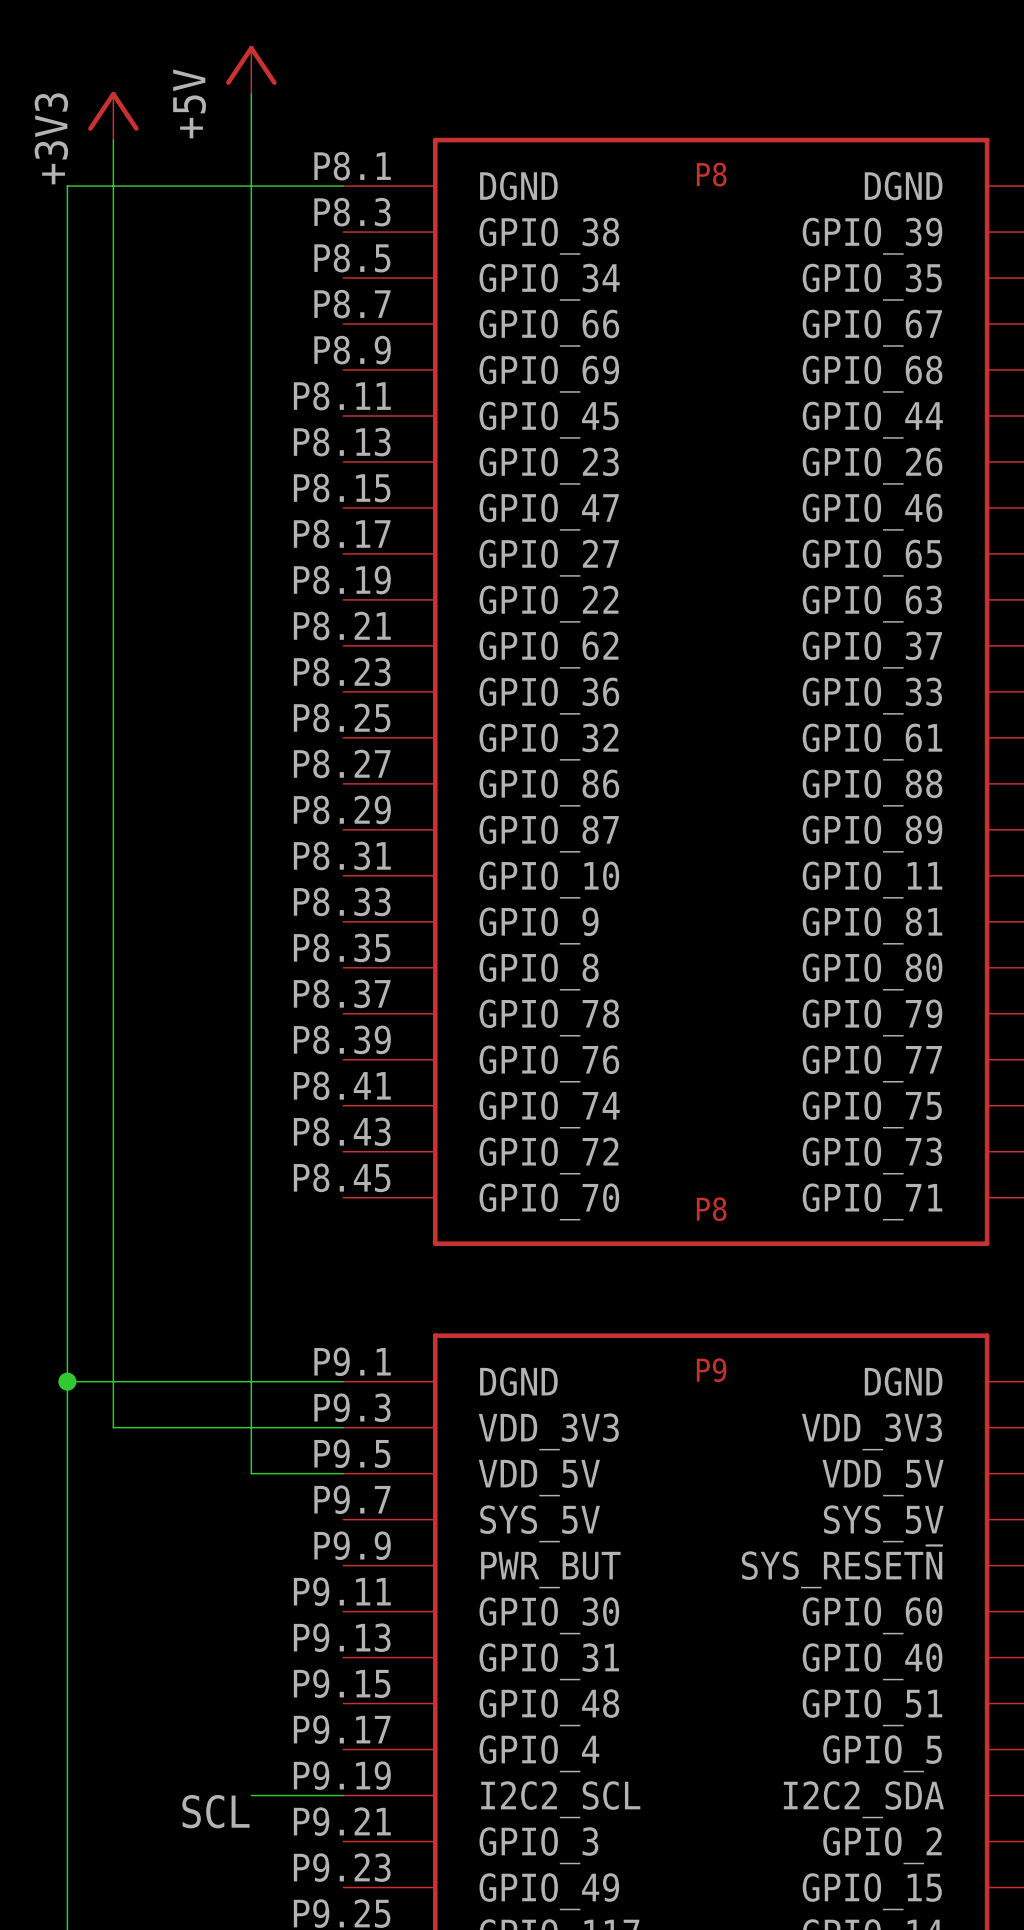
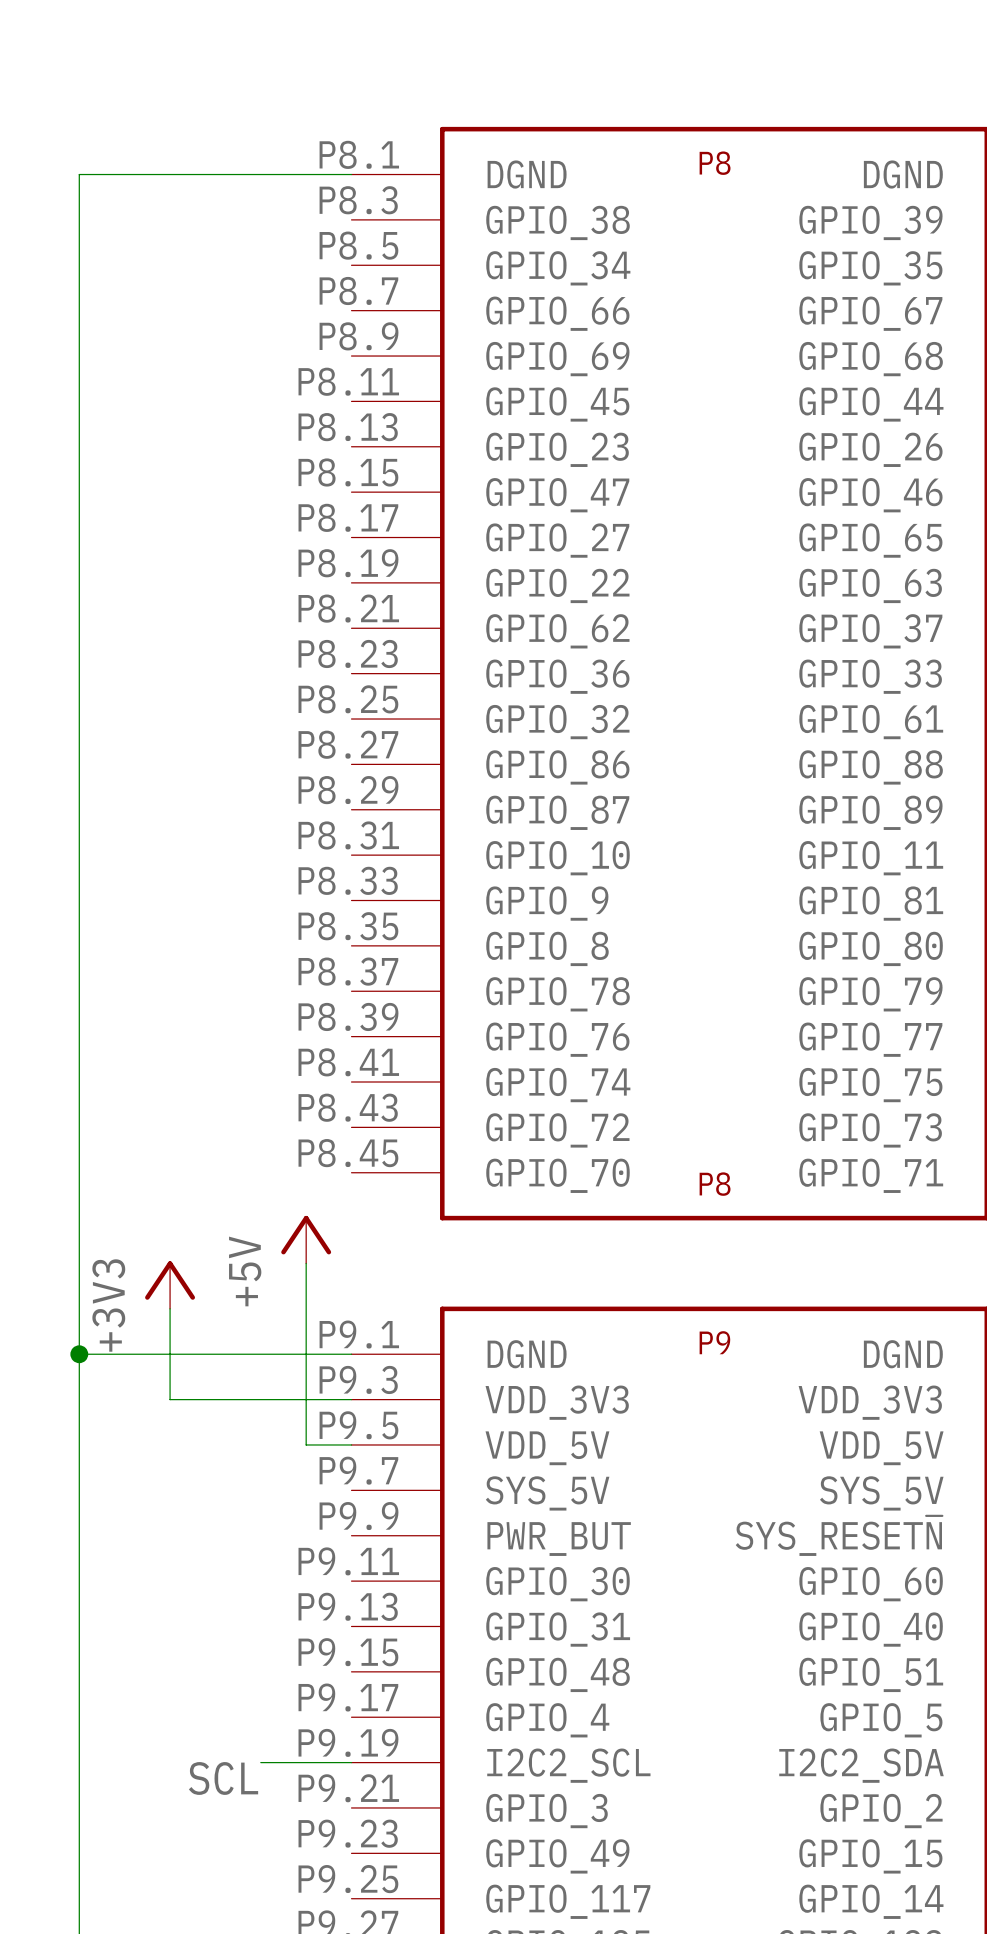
power symbol: +5V (251, 69) -> none
wire: (251, 94) (251, 1473) (297, 1473) -> (306, 1263) (306, 1444)
power symbol: +3V3 (113, 115) -> none
wire: (113, 140) (113, 1427) (159, 1427) -> (170, 1308) (170, 1399)
power symbol: none -> +5V (306, 1239)
power symbol: none -> +3V3 (170, 1285)

